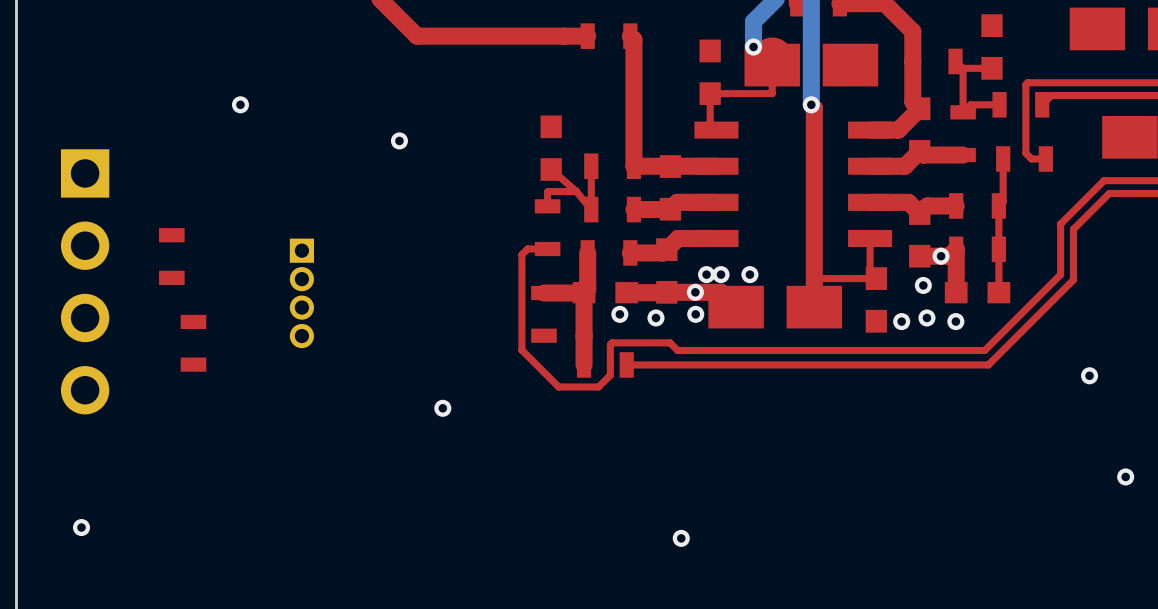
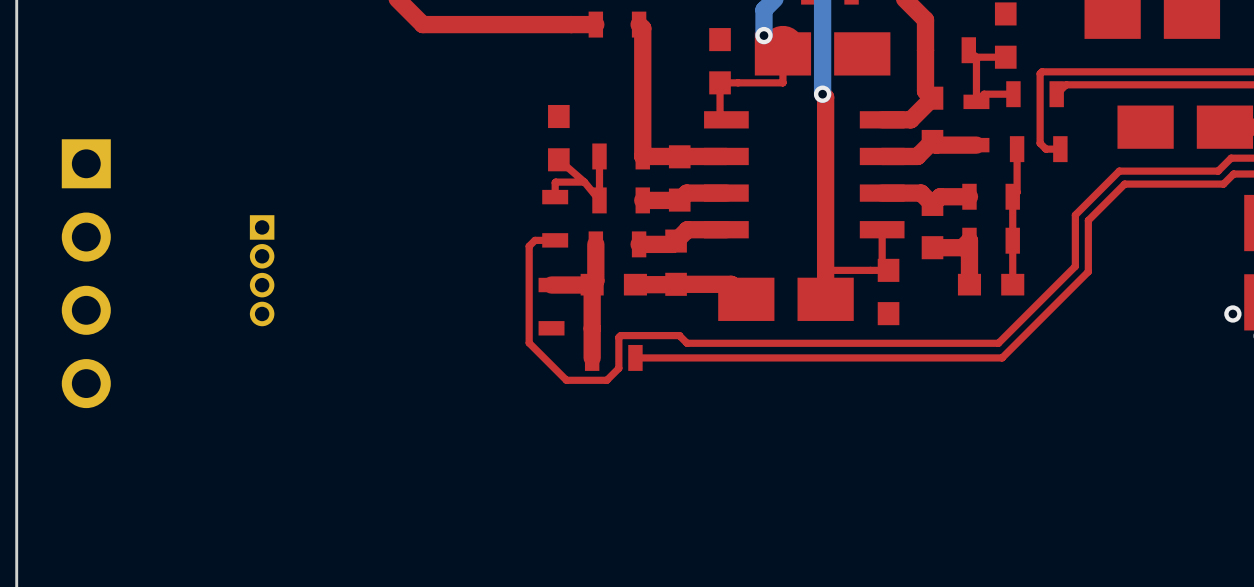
via: (240, 104) -> none
via: (399, 140) -> none
part: (171, 256) -> none
via: (941, 256) -> none
via: (706, 274) -> none
via: (721, 274) -> none
via: (749, 274) -> none
via: (923, 285) -> none
via: (695, 292) -> none
part position: (301, 293) -> (262, 270)
via: (619, 314) -> none
via: (695, 314) -> none
via: (655, 317) -> none
via: (926, 317) -> none
via: (901, 321) -> none
via: (955, 321) -> none
part: (193, 343) -> none
via: (1089, 375) -> none
via: (442, 408) -> none
via: (1125, 476) -> none
via: (81, 527) -> none
via: (681, 538) -> none

